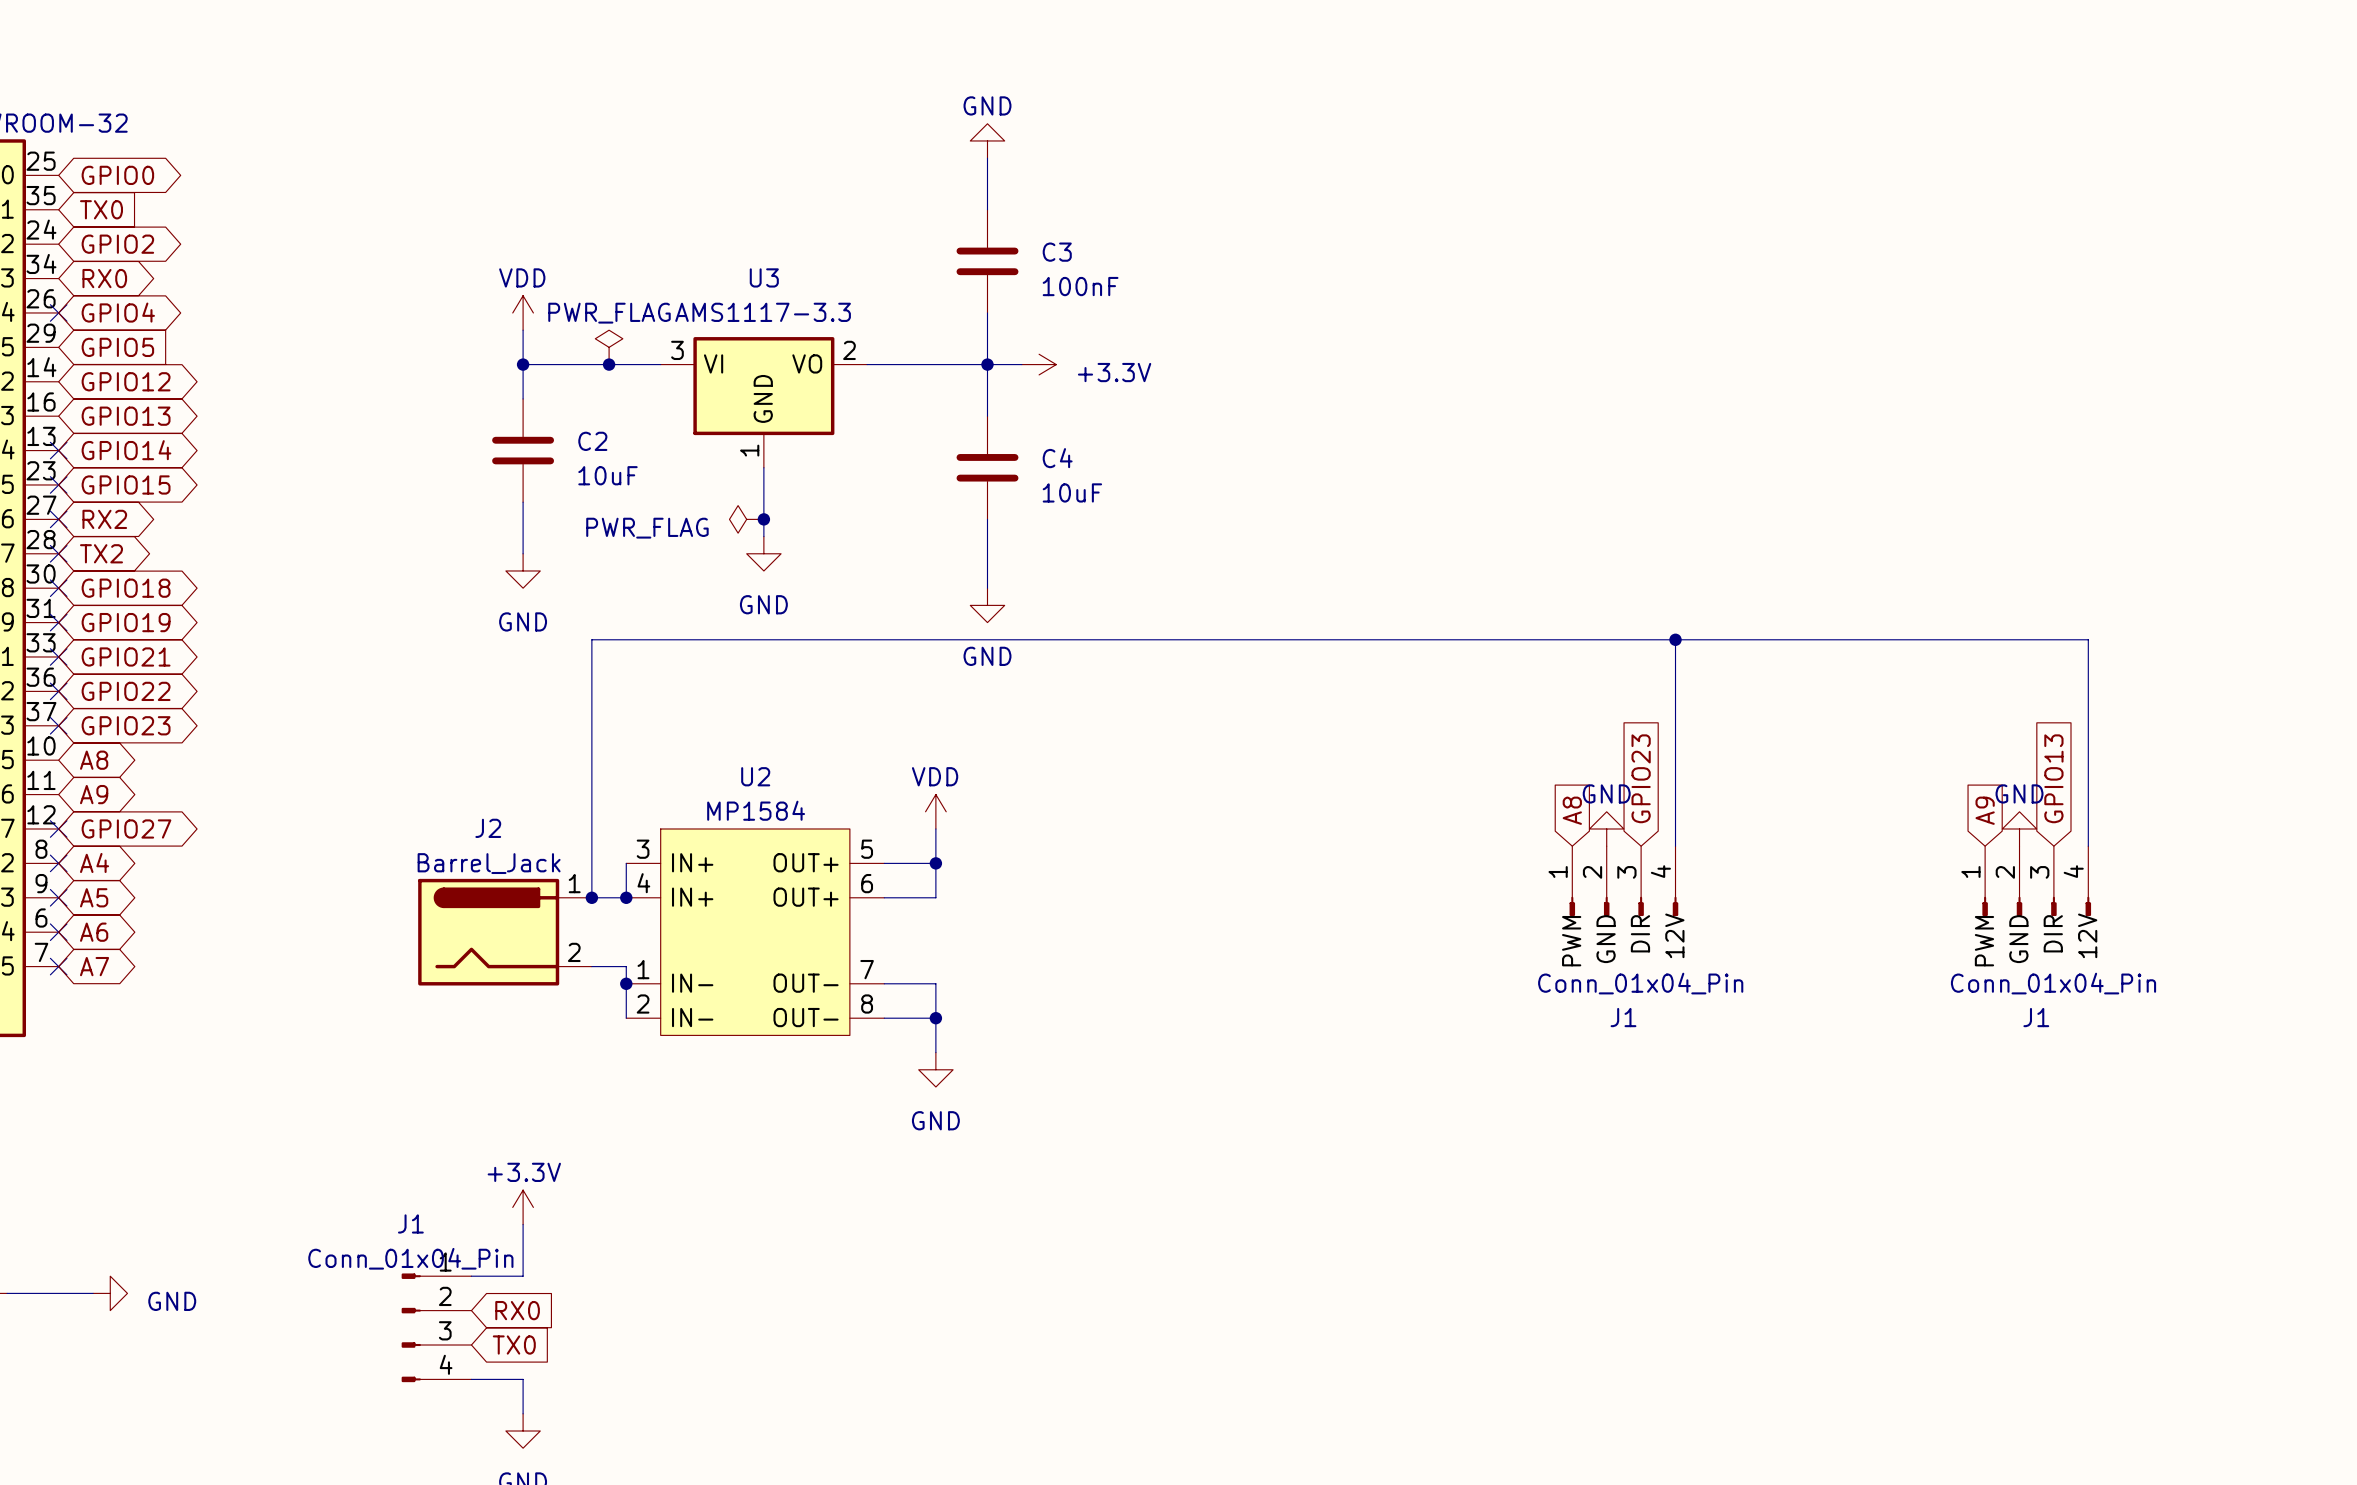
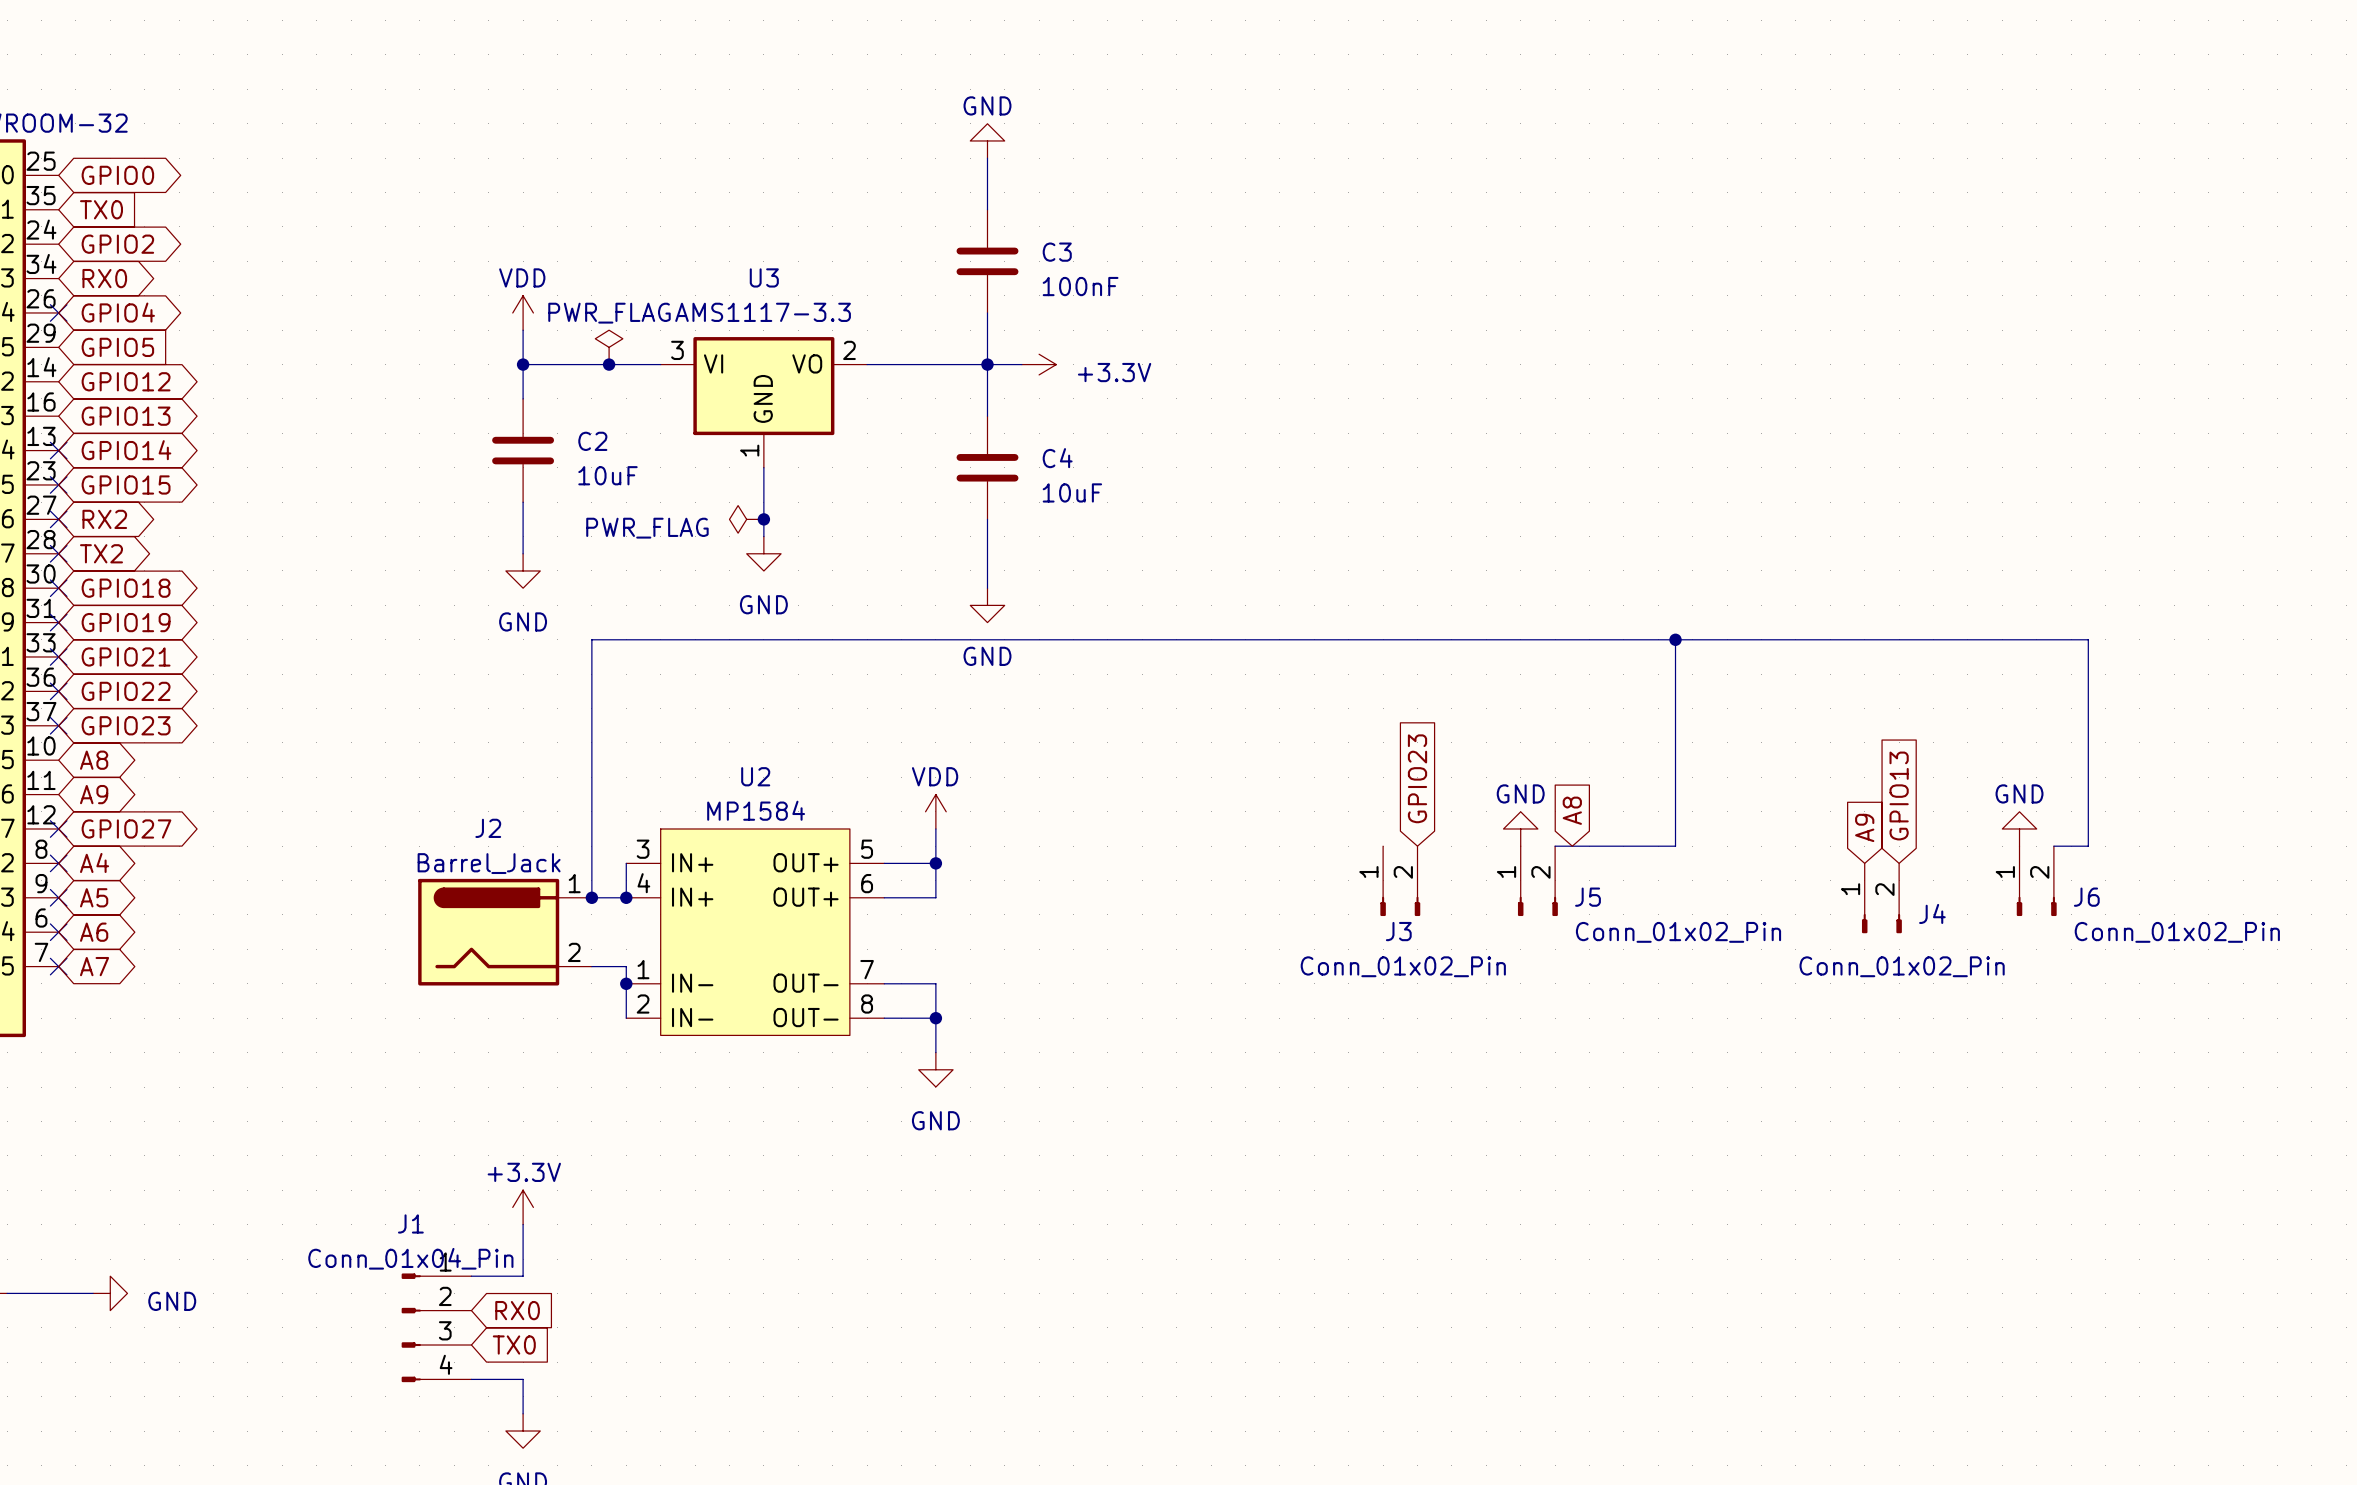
global label position: GPIO23 (1641, 778) -> GPIO23 (1417, 778)
global label position: GPIO13 (2053, 778) -> GPIO13 (1899, 795)
global label position: A9 (1985, 810) -> A9 (1864, 827)
power symbol position: GND (1606, 828) -> GND (1520, 828)
wire: none -> (1555, 846) (1675, 846)
wire: none -> (2053, 846) (2088, 846)
J3: none -> Conn_01x02_Pin (1400, 881)
J5: none -> Conn_01x02_Pin (1537, 881)
J1: Conn_01x04_Pin (1623, 881) -> none
J1: Conn_01x04_Pin (2036, 881) -> none
J6: none -> Conn_01x02_Pin (2036, 881)
J4: none -> Conn_01x02_Pin (1881, 898)

